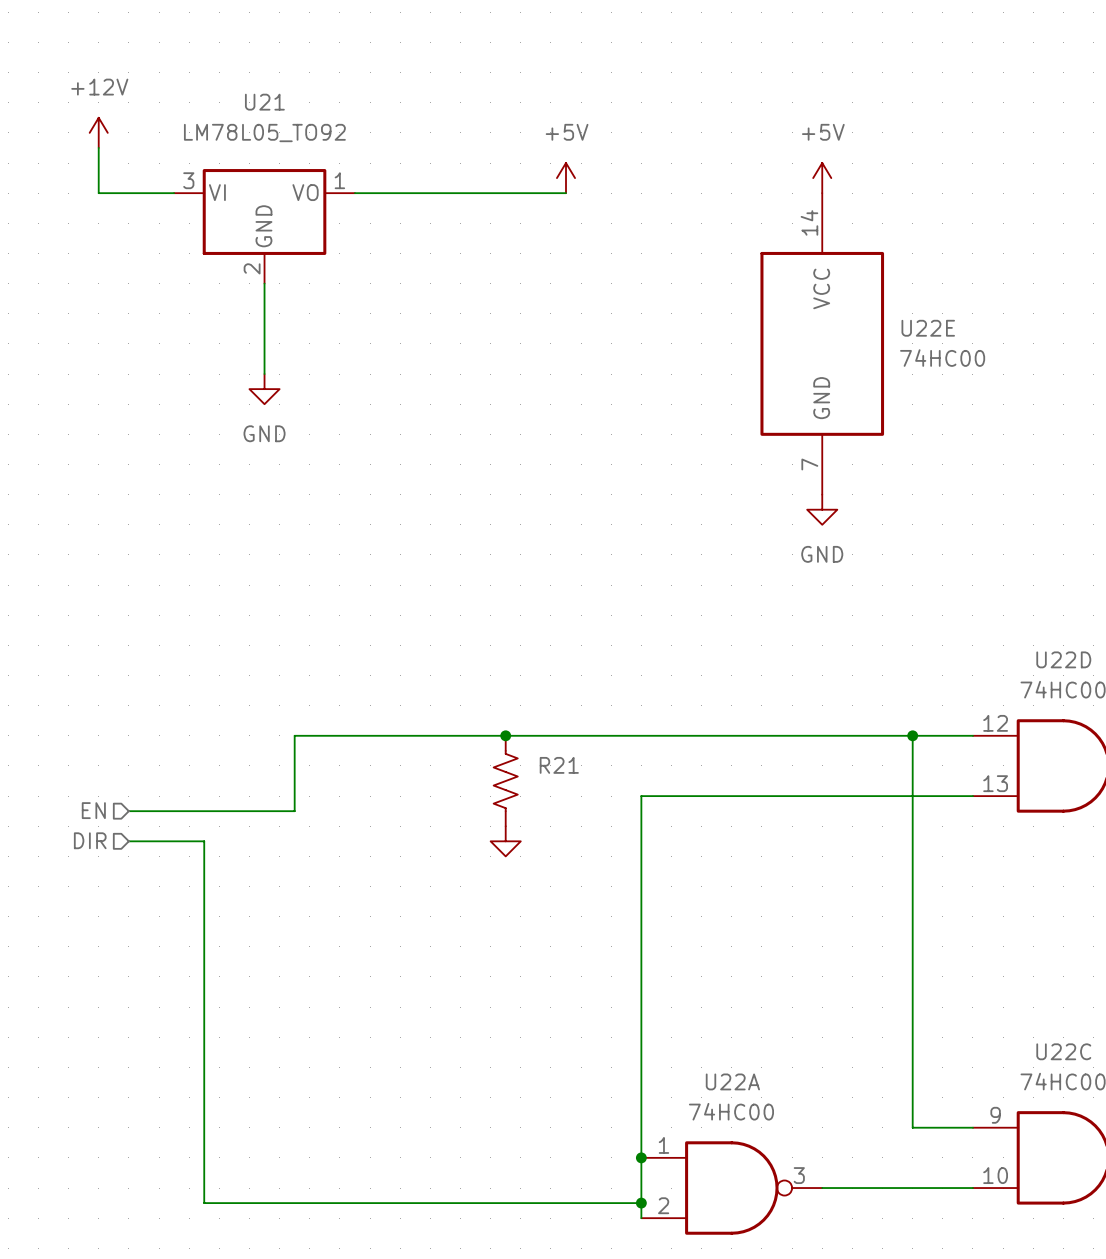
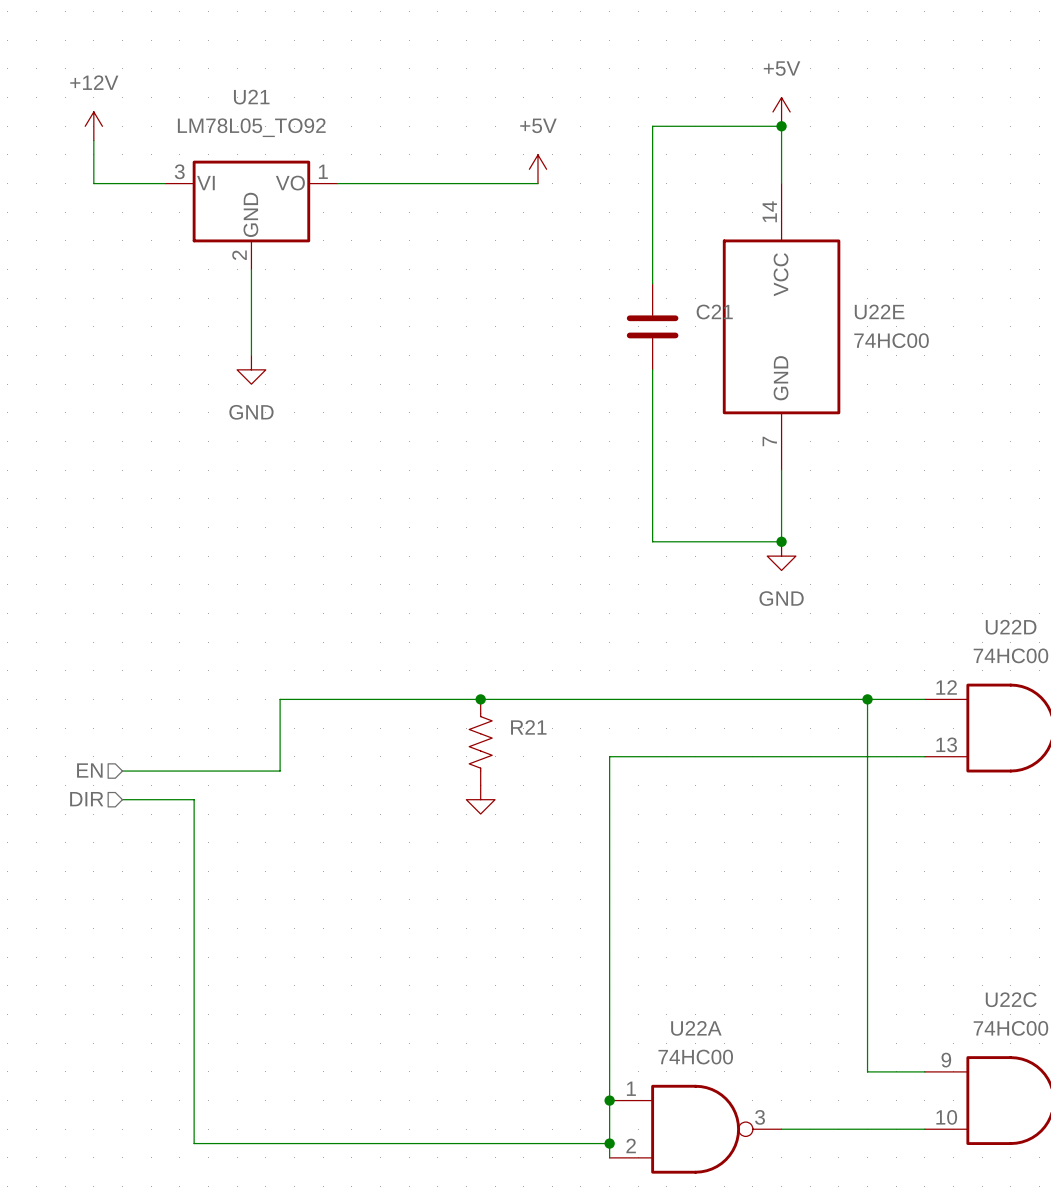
junction: none -> (781, 126)
power symbol position: +5V (822, 178) -> +5V (781, 111)
wire: none -> (781, 183) (781, 126) (652, 126) (652, 283)
C21: none -> (652, 326)
wire: none -> (652, 369) (652, 541) (781, 541) (781, 470)
power symbol position: GND (822, 509) -> GND (781, 556)
junction: none -> (781, 541)

